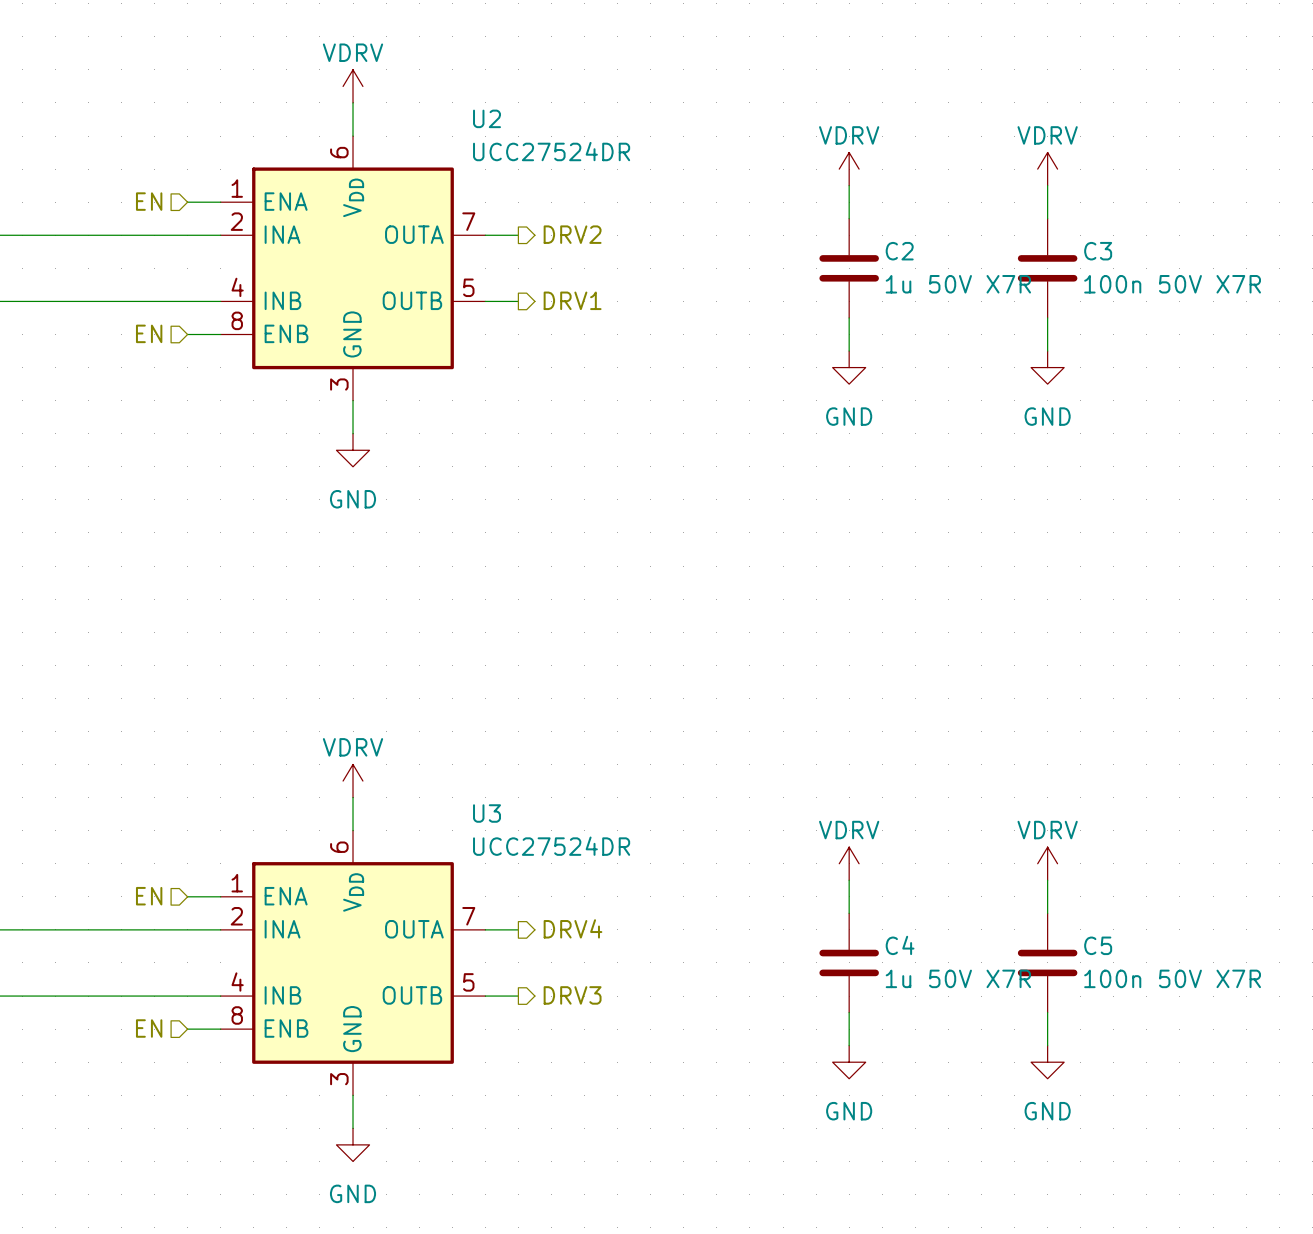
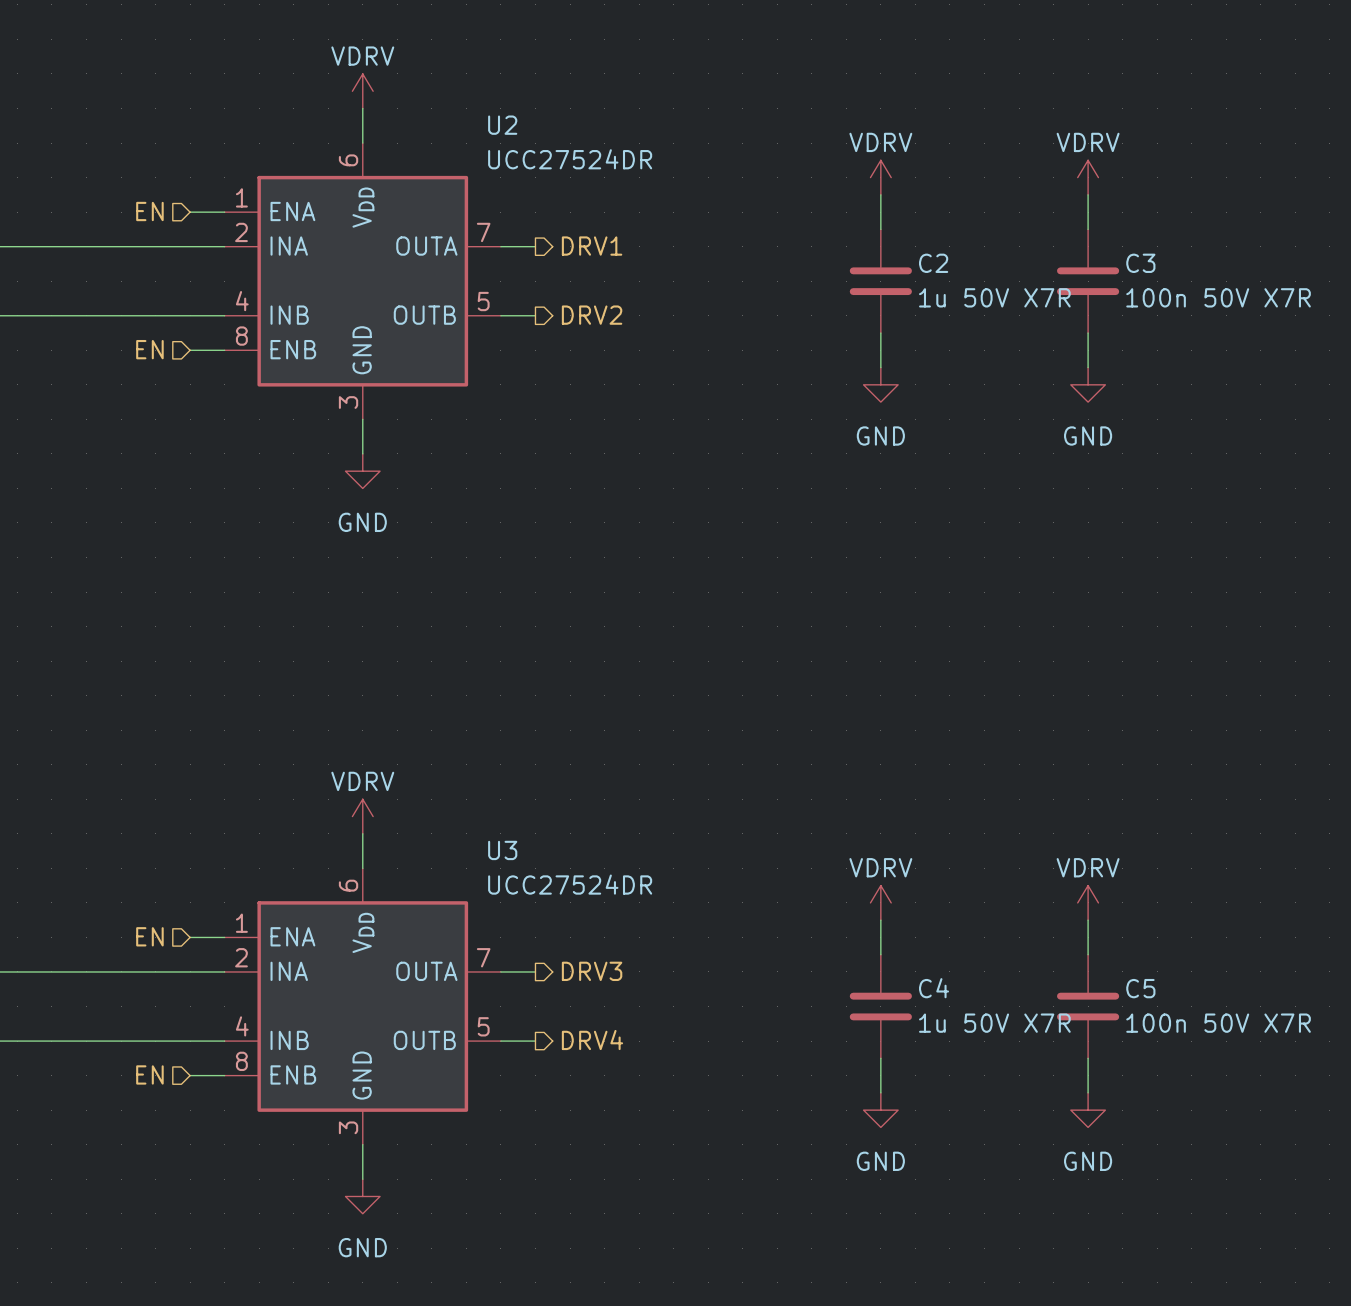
hierarchical label: DRV2 (572, 234) -> DRV1 (592, 246)
hierarchical label: DRV1 (572, 300) -> DRV2 (592, 315)
hierarchical label: DRV4 (572, 928) -> DRV3 (592, 971)
hierarchical label: DRV3 (572, 995) -> DRV4 (592, 1040)

